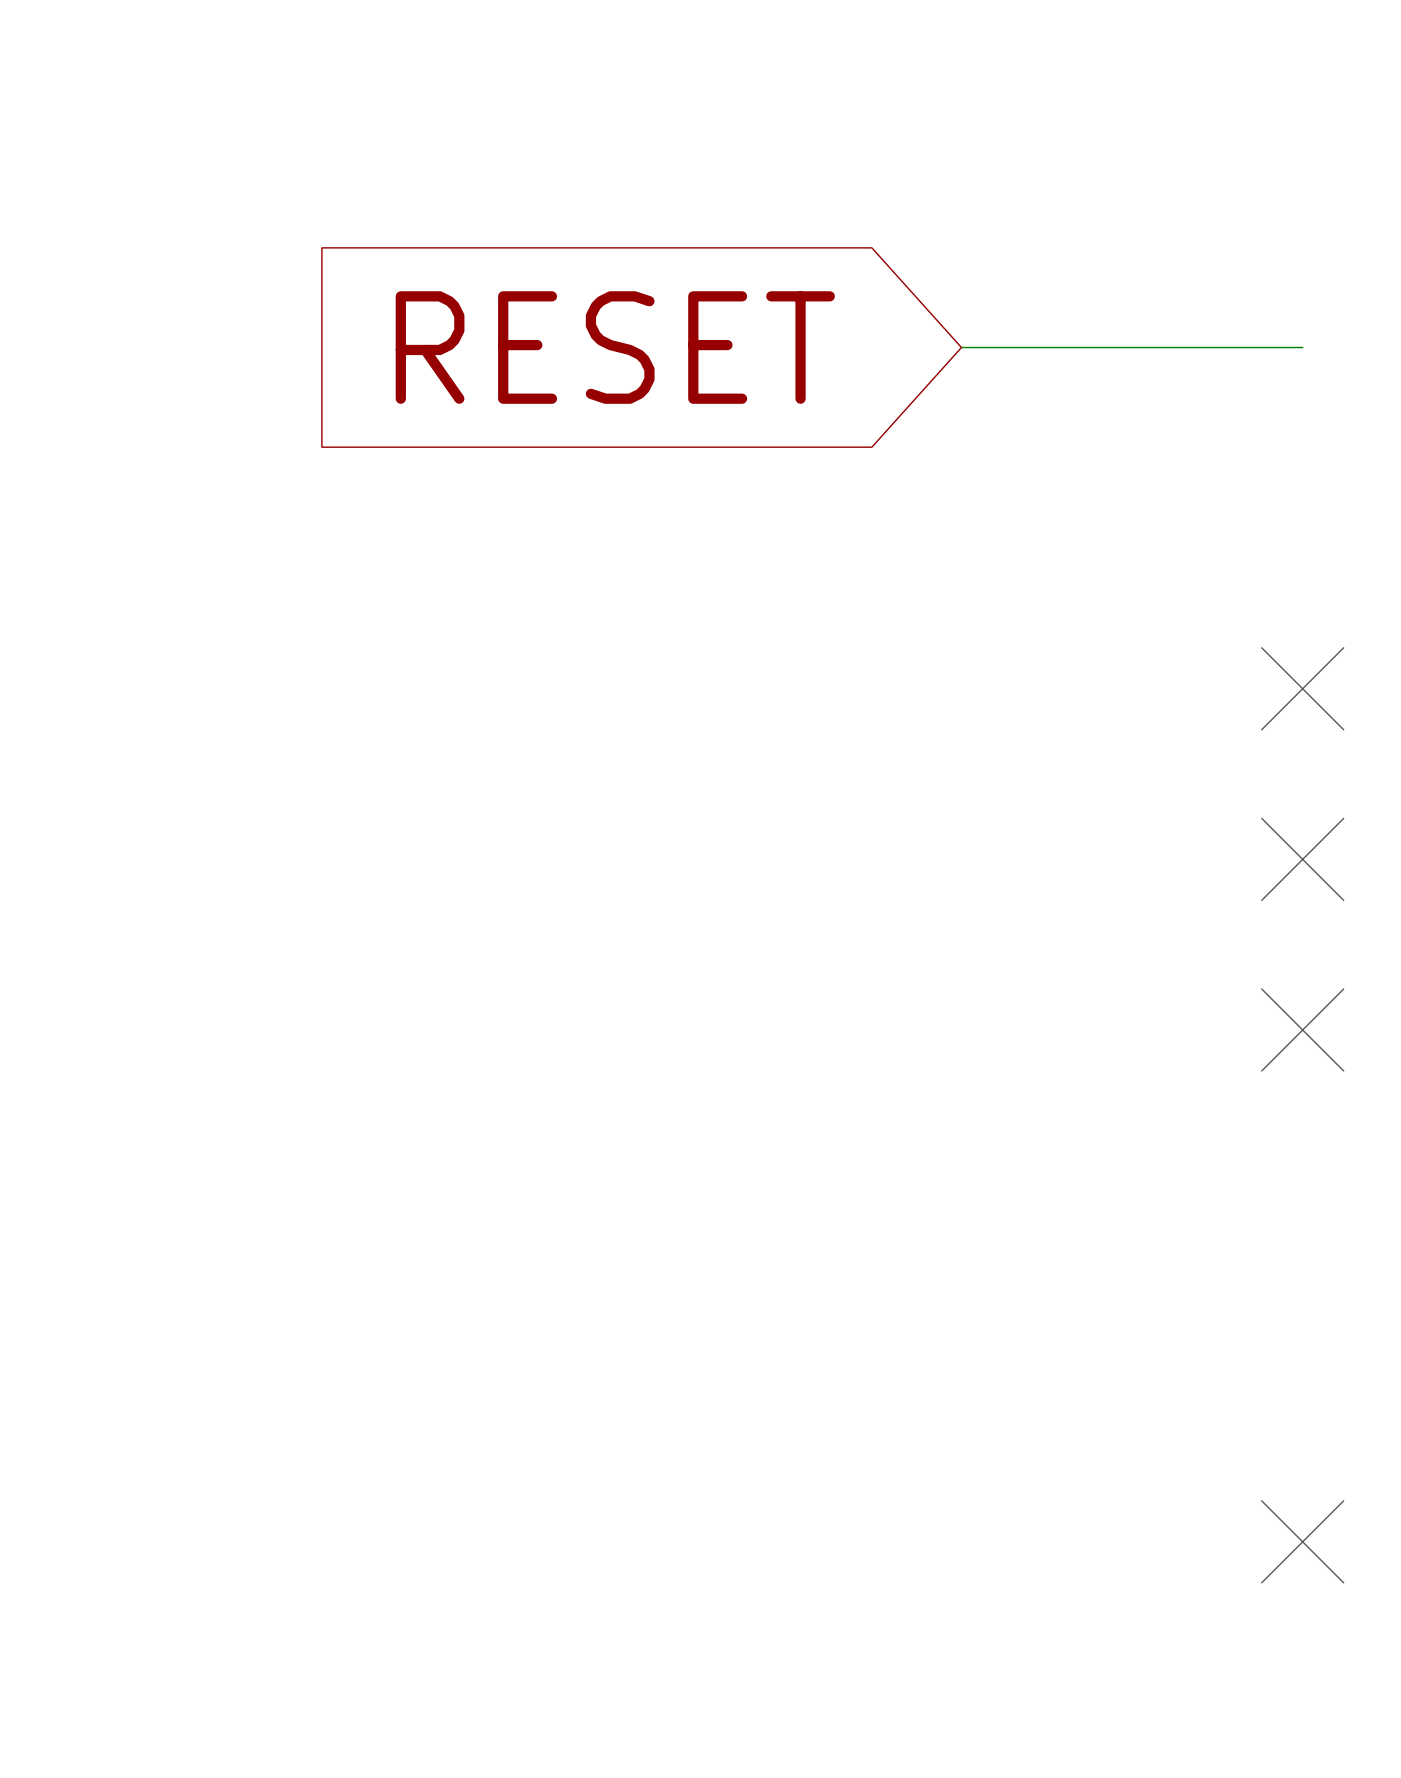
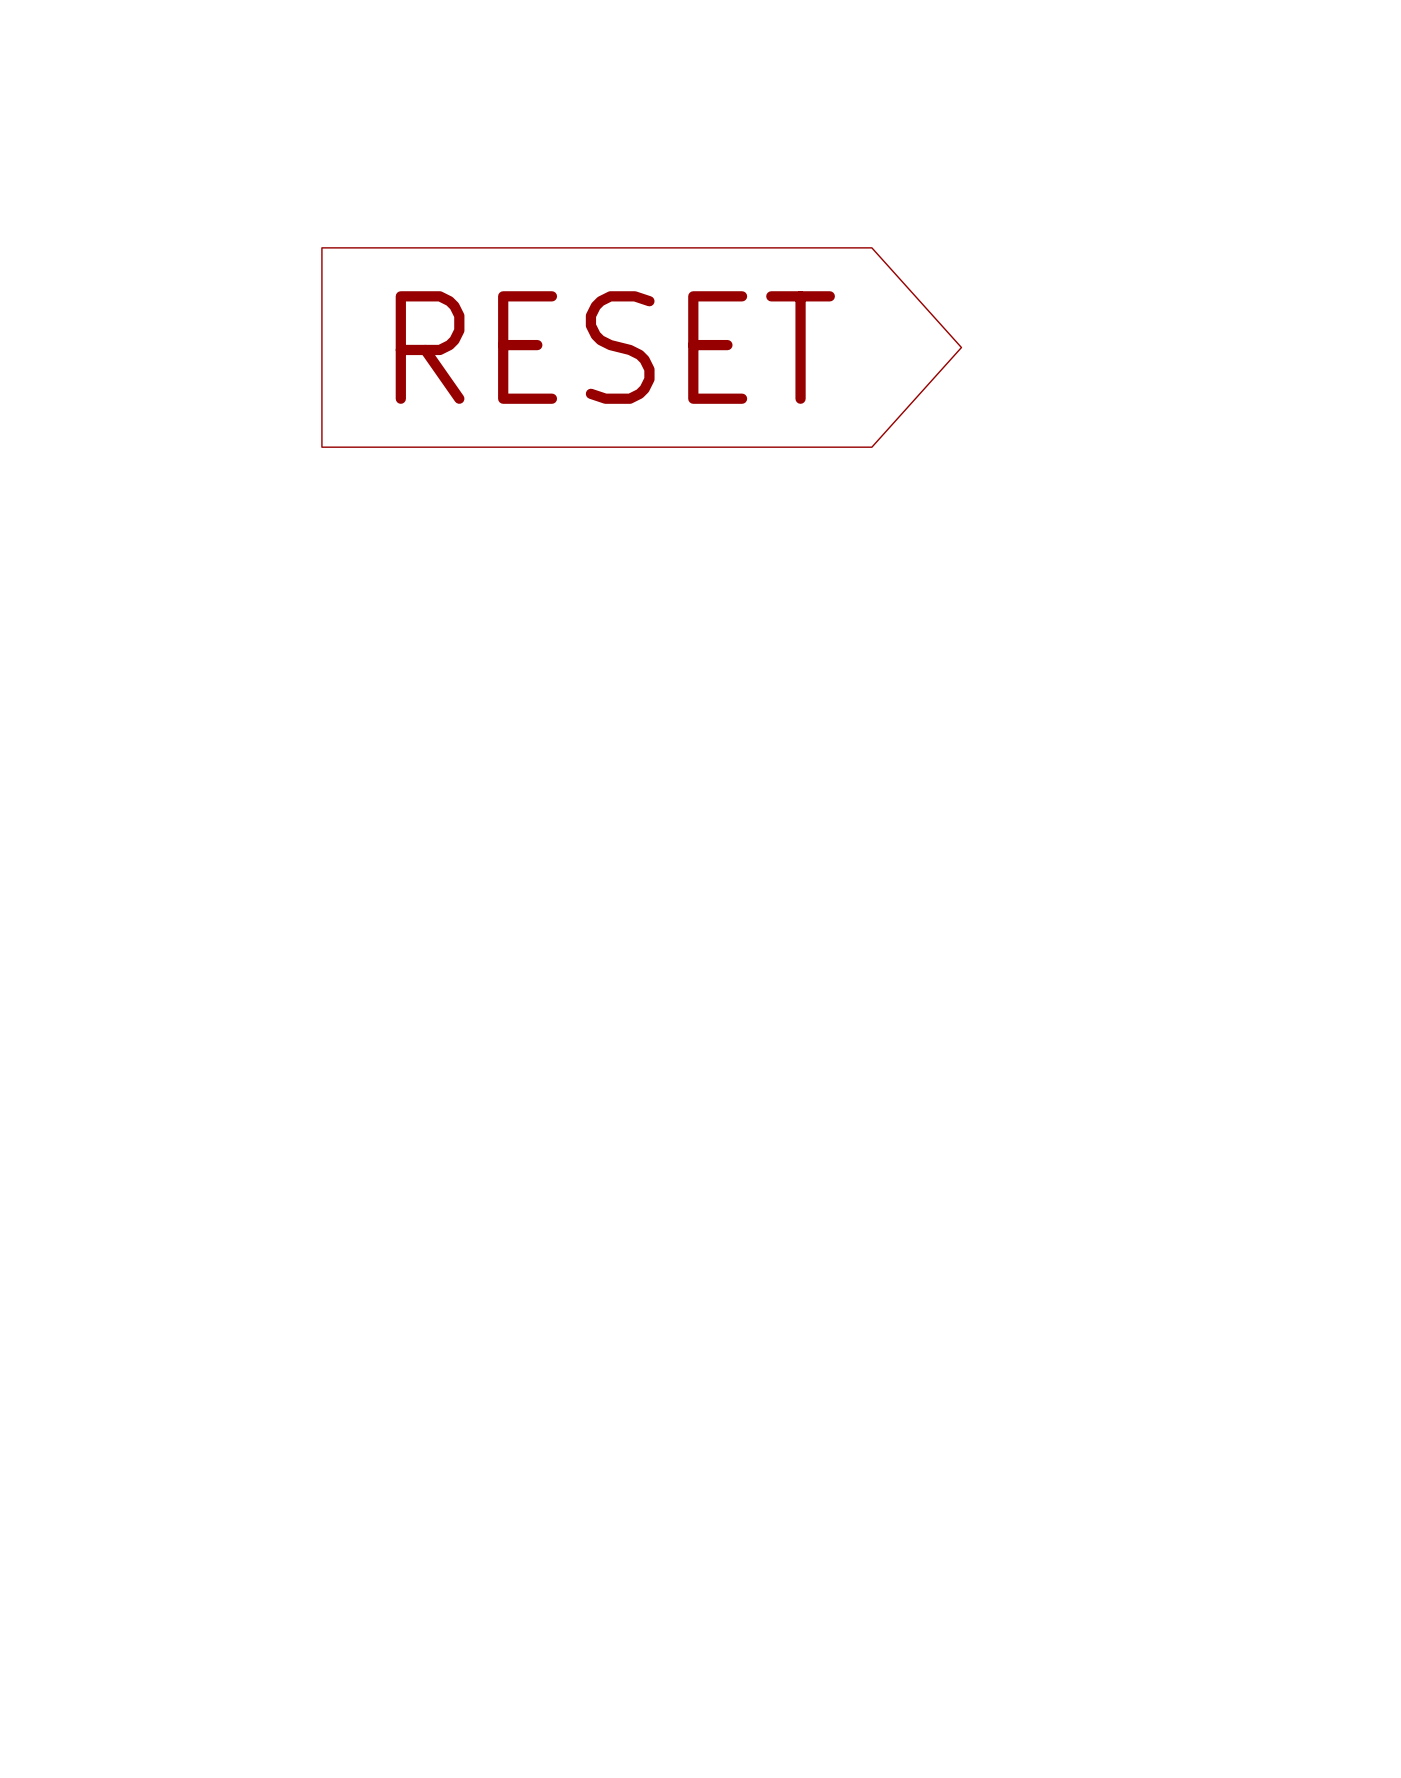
wire: (961, 347) (1302, 347) -> none
no-connect mark: (1302, 688) -> none
no-connect mark: (1302, 859) -> none
no-connect mark: (1302, 1029) -> none
no-connect mark: (1302, 1541) -> none

